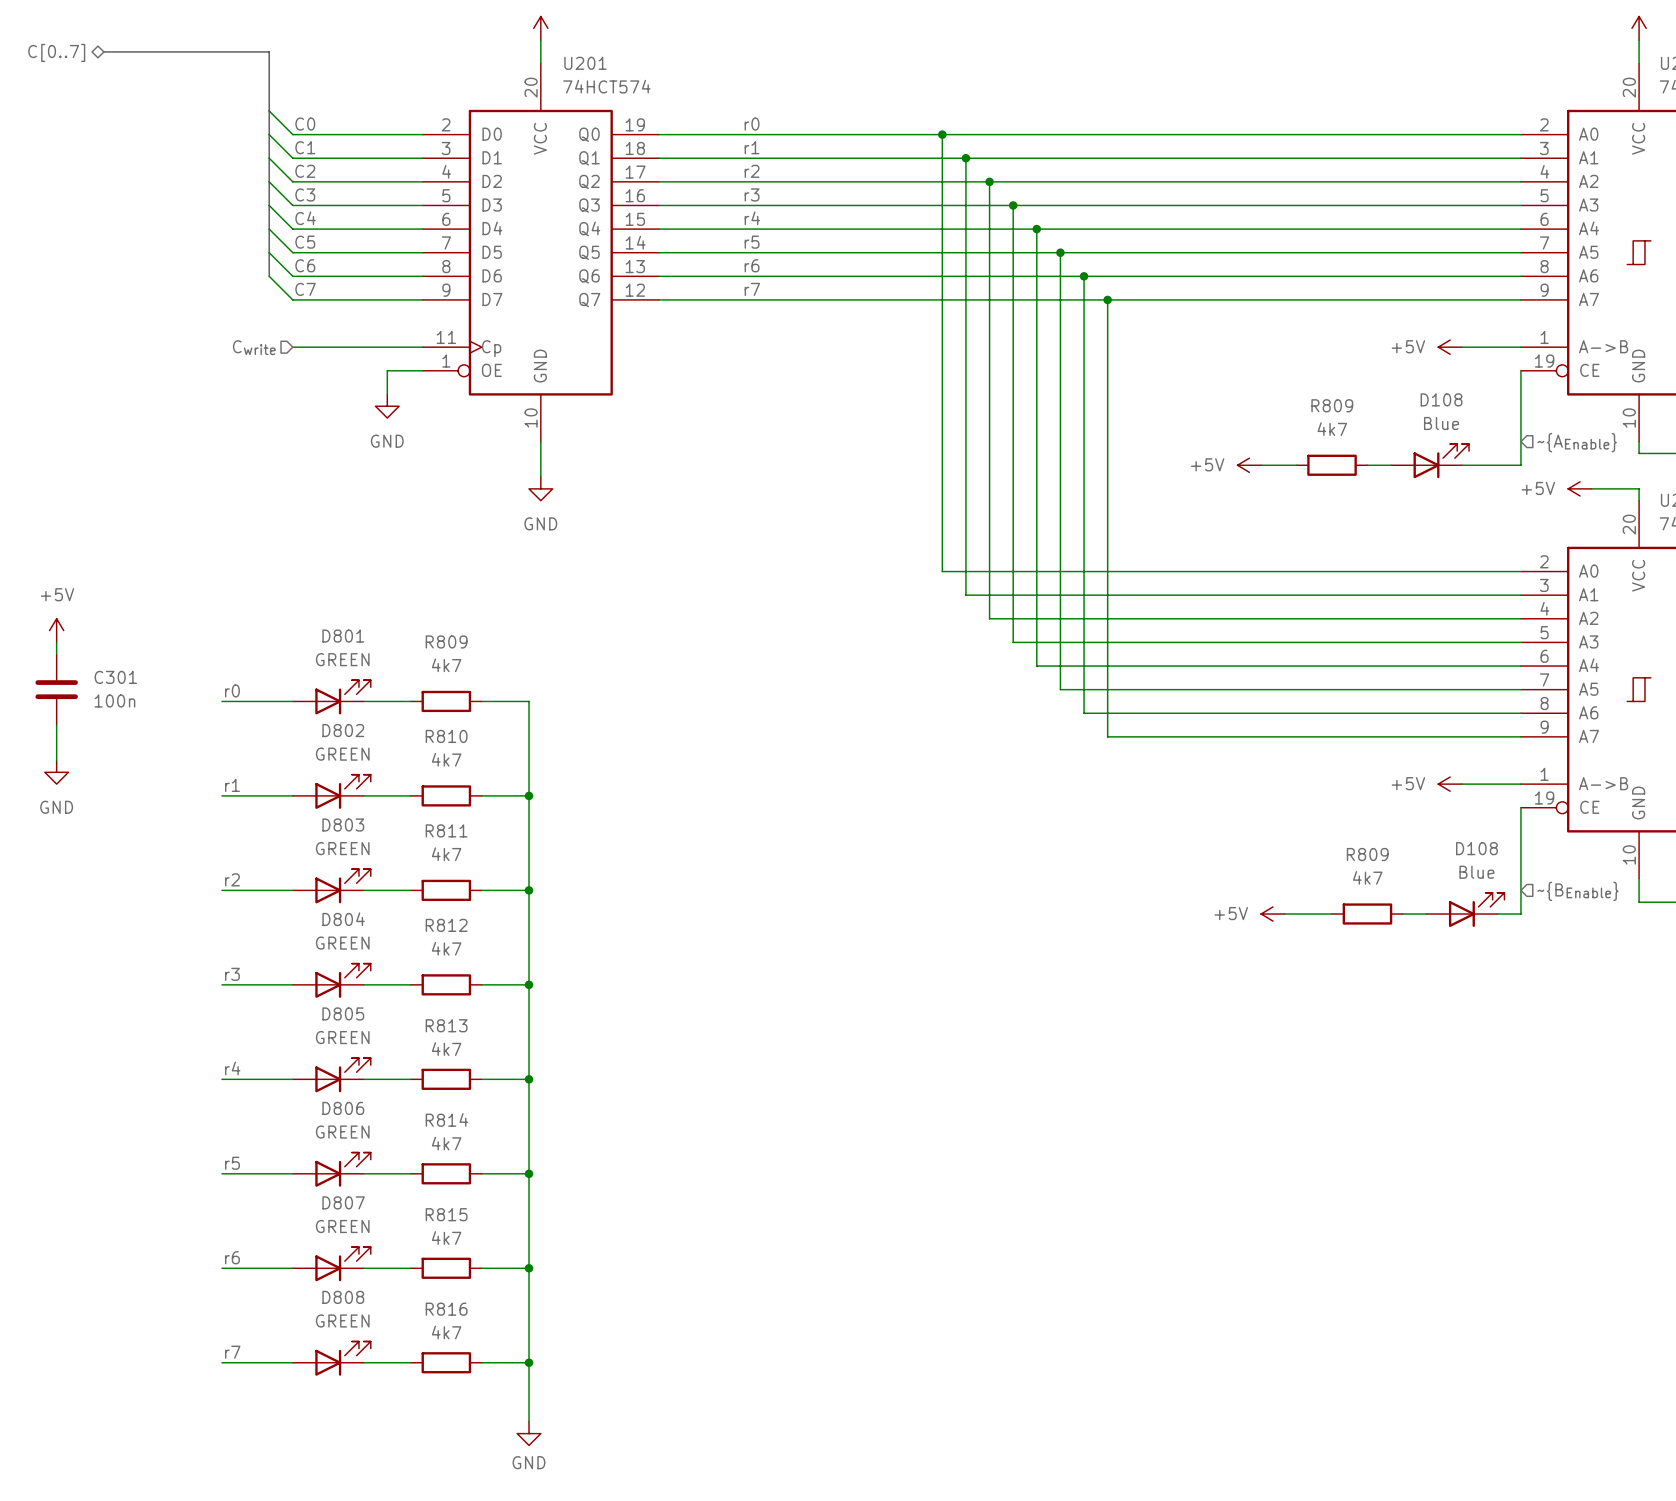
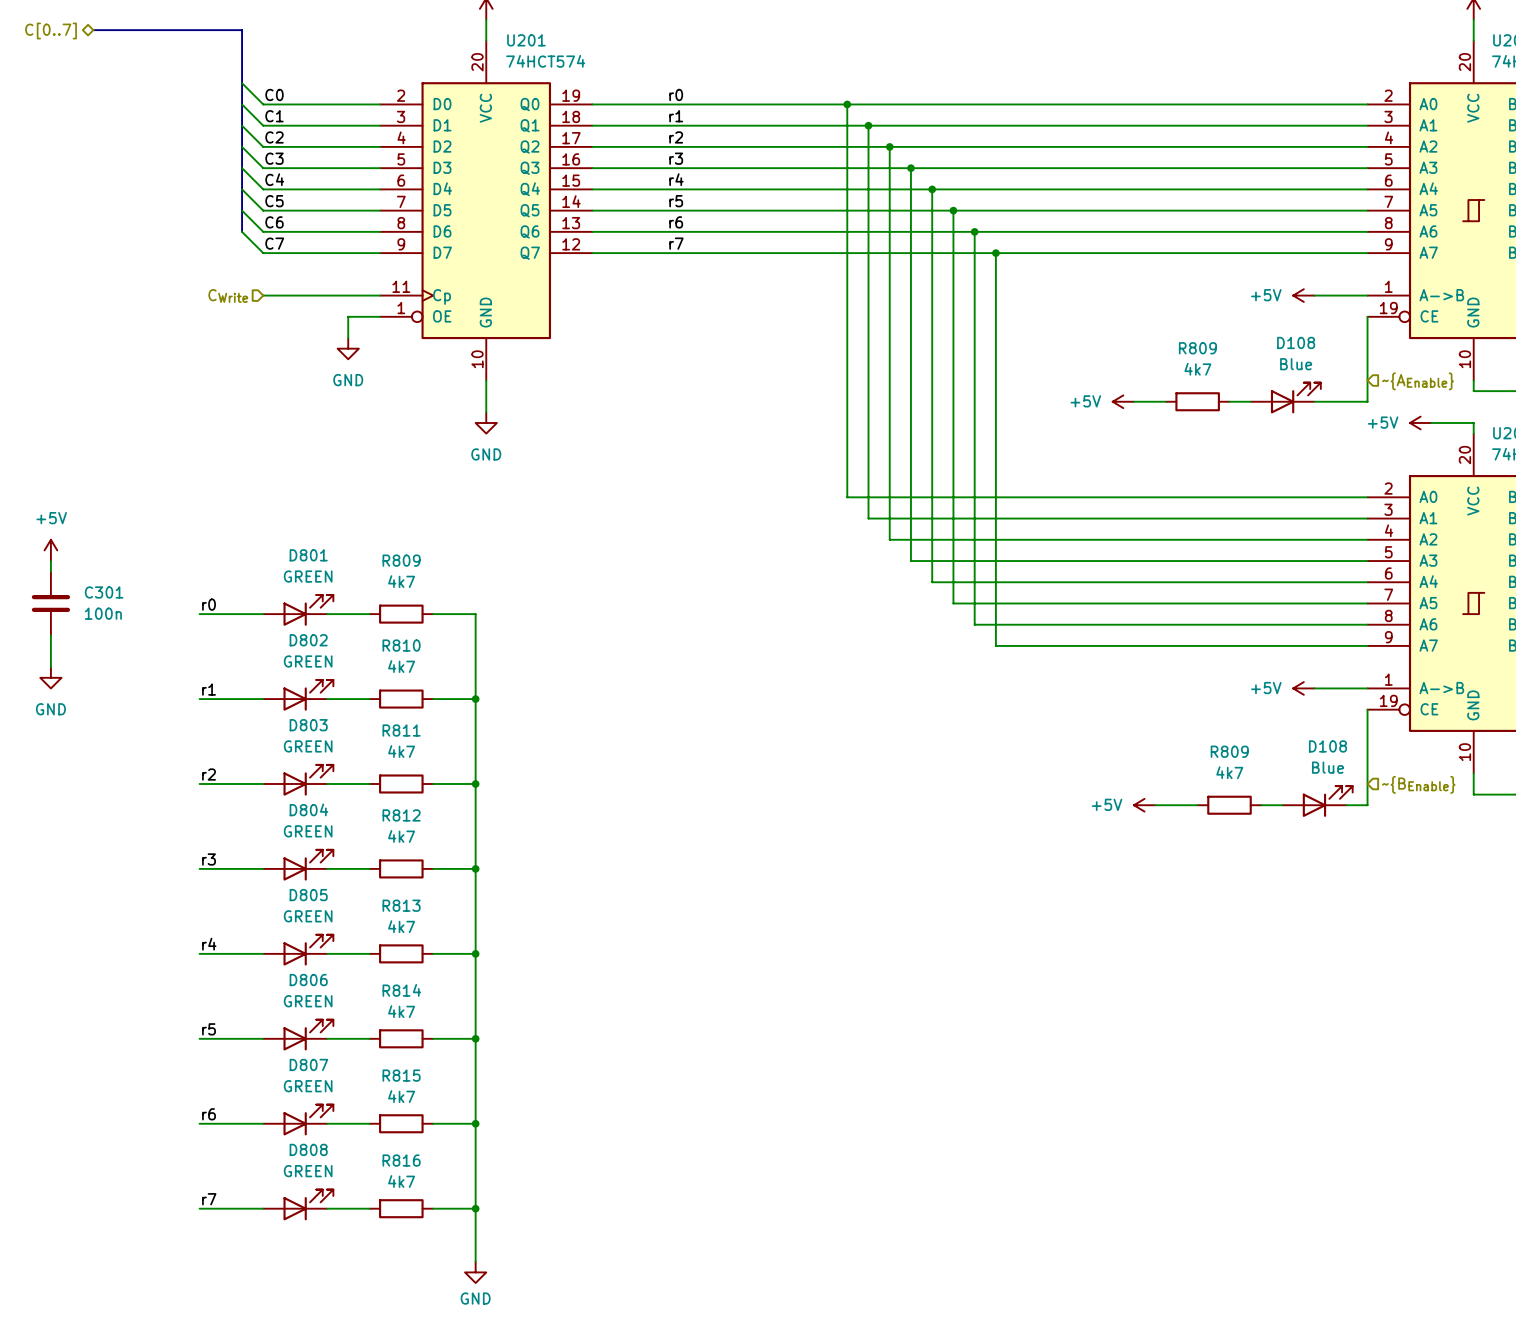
hierarchical label: Cwrite (254, 347) -> CWrite (228, 295)

